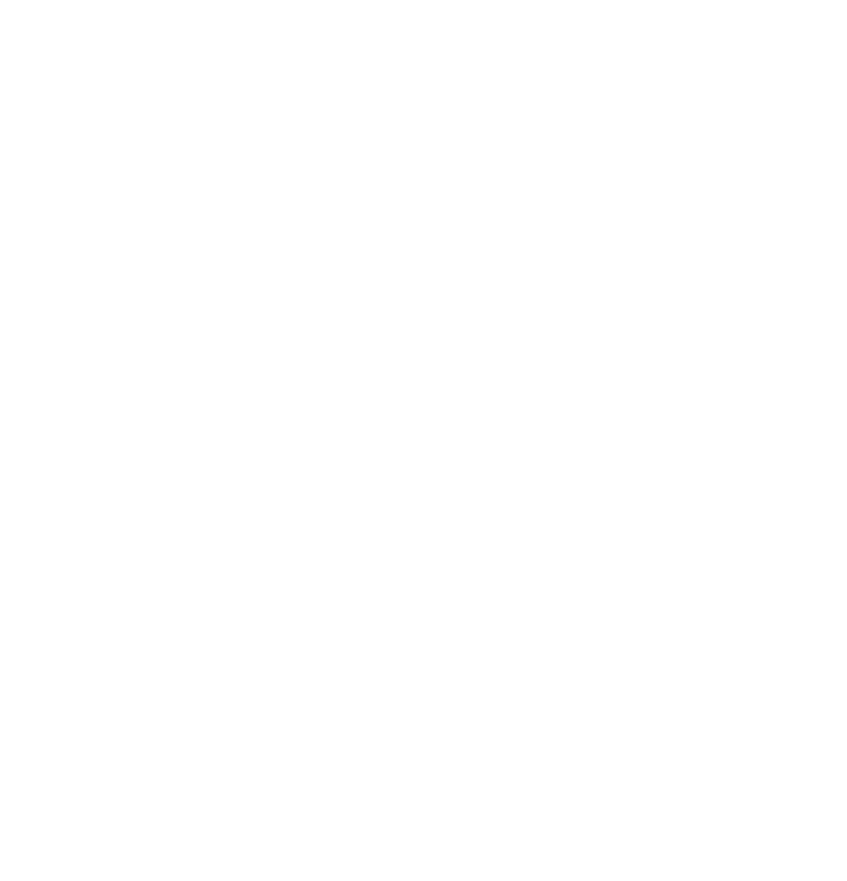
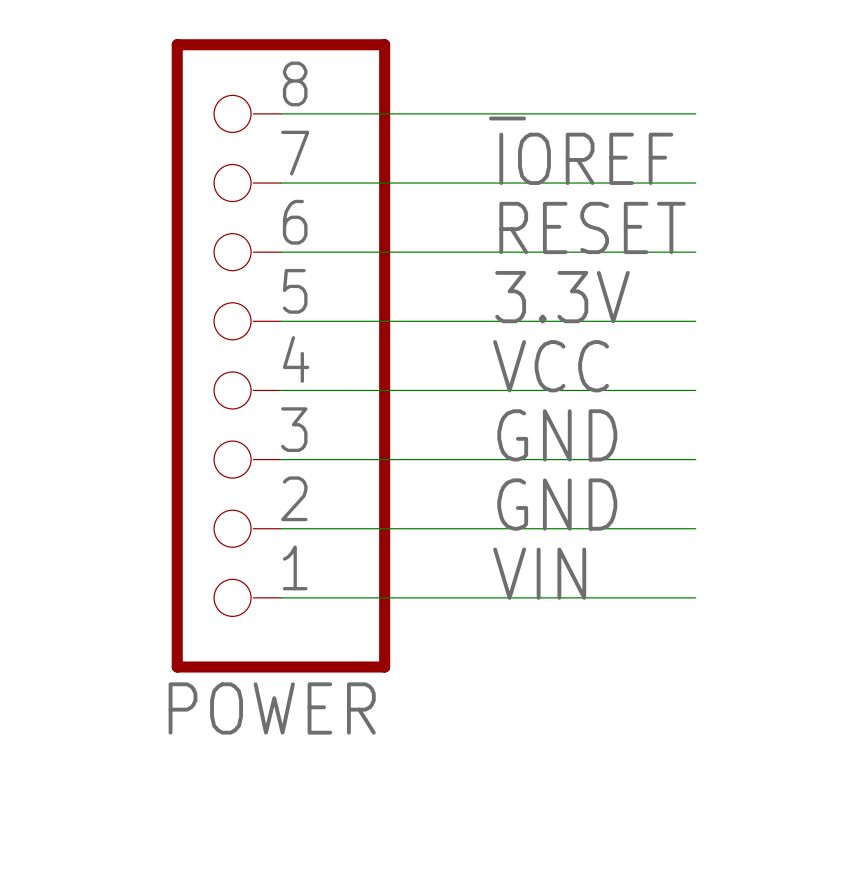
wire: none -> (280, 113) (695, 113)
label: none -> _ (507, 118)
label: none -> IOREF (586, 158)
wire: none -> (280, 183) (695, 183)
label: none -> RESET (592, 227)
wire: none -> (280, 252) (695, 252)
label: none -> 3.3V (562, 297)
wire: none -> (280, 321) (695, 321)
POWER: none -> (280, 355)
label: none -> VCC (551, 366)
wire: none -> (280, 390) (695, 390)
label: none -> GND (557, 435)
wire: none -> (280, 459) (695, 459)
label: none -> GND (557, 504)
wire: none -> (280, 528) (695, 528)
label: none -> VIN (539, 573)
wire: none -> (280, 597) (695, 597)

